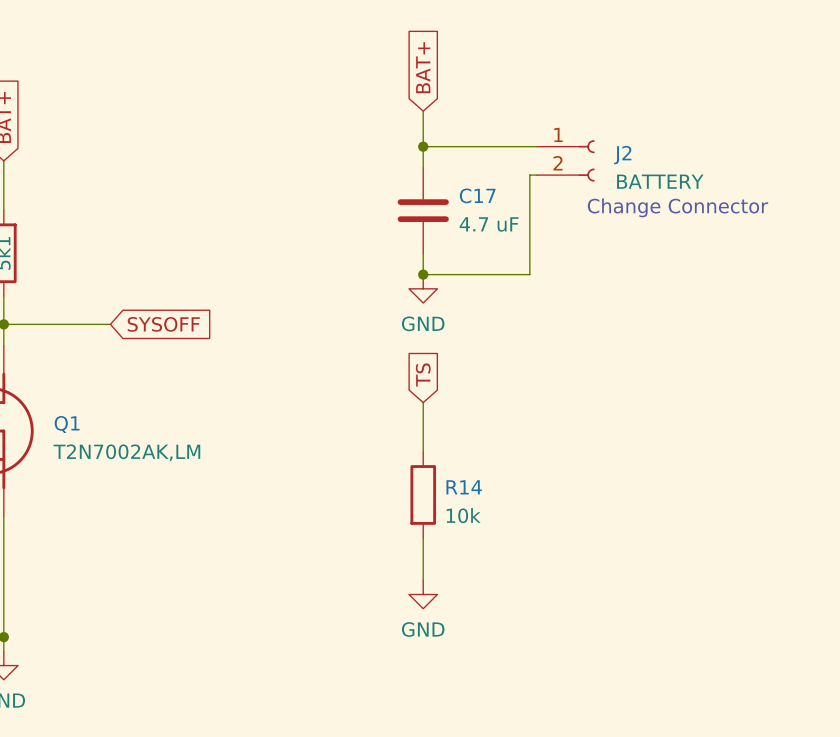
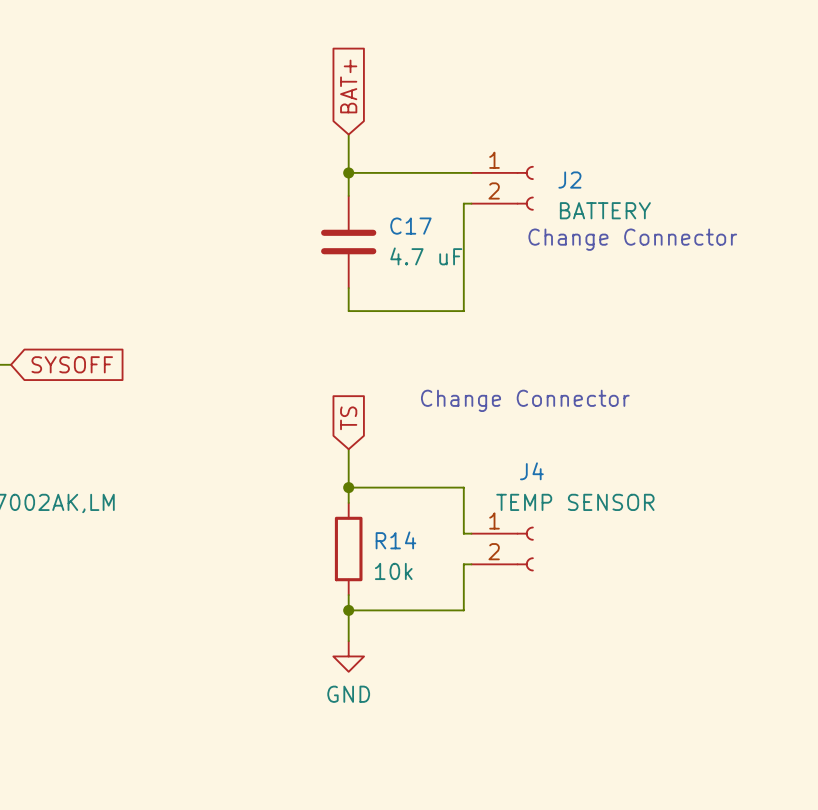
junction: (423, 274) -> none
power symbol: GND (423, 288) -> none
text: none -> Change Connector (525, 400)
wire: none -> (348, 487) (463, 487) (463, 533) (471, 533)
junction: none -> (348, 487)
J4: none -> TEMP SENSOR (502, 549)
wire: none -> (471, 564) (463, 564) (463, 610) (348, 610)
junction: none -> (348, 610)

